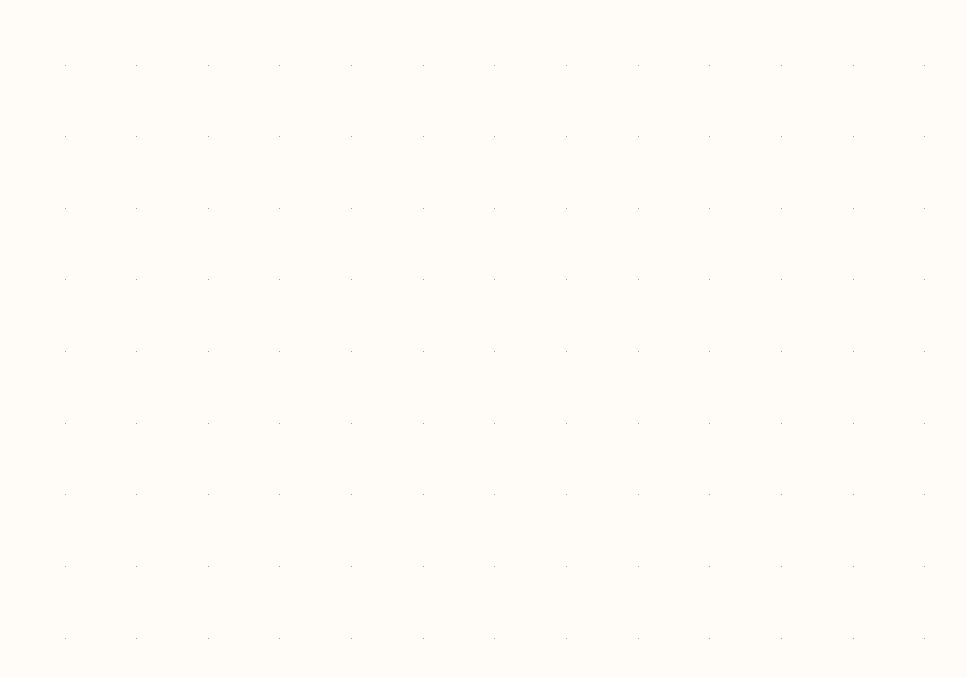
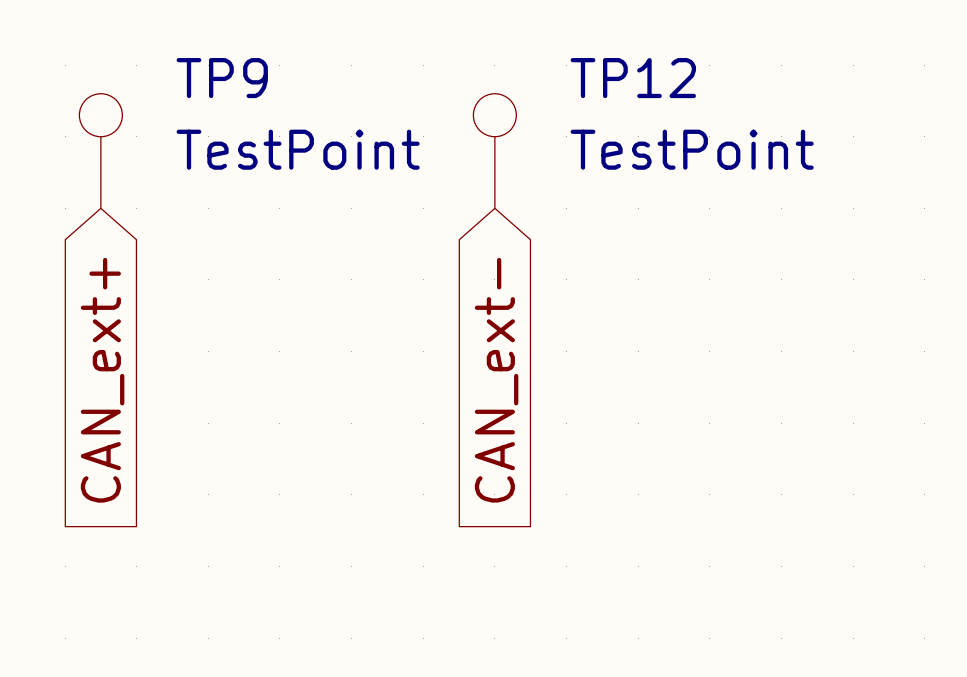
TP9: none -> TestPoint (100, 151)
TP12: none -> TestPoint (494, 151)
global label: none -> CAN_ext+ (102, 380)
global label: none -> CAN_ext- (496, 380)

